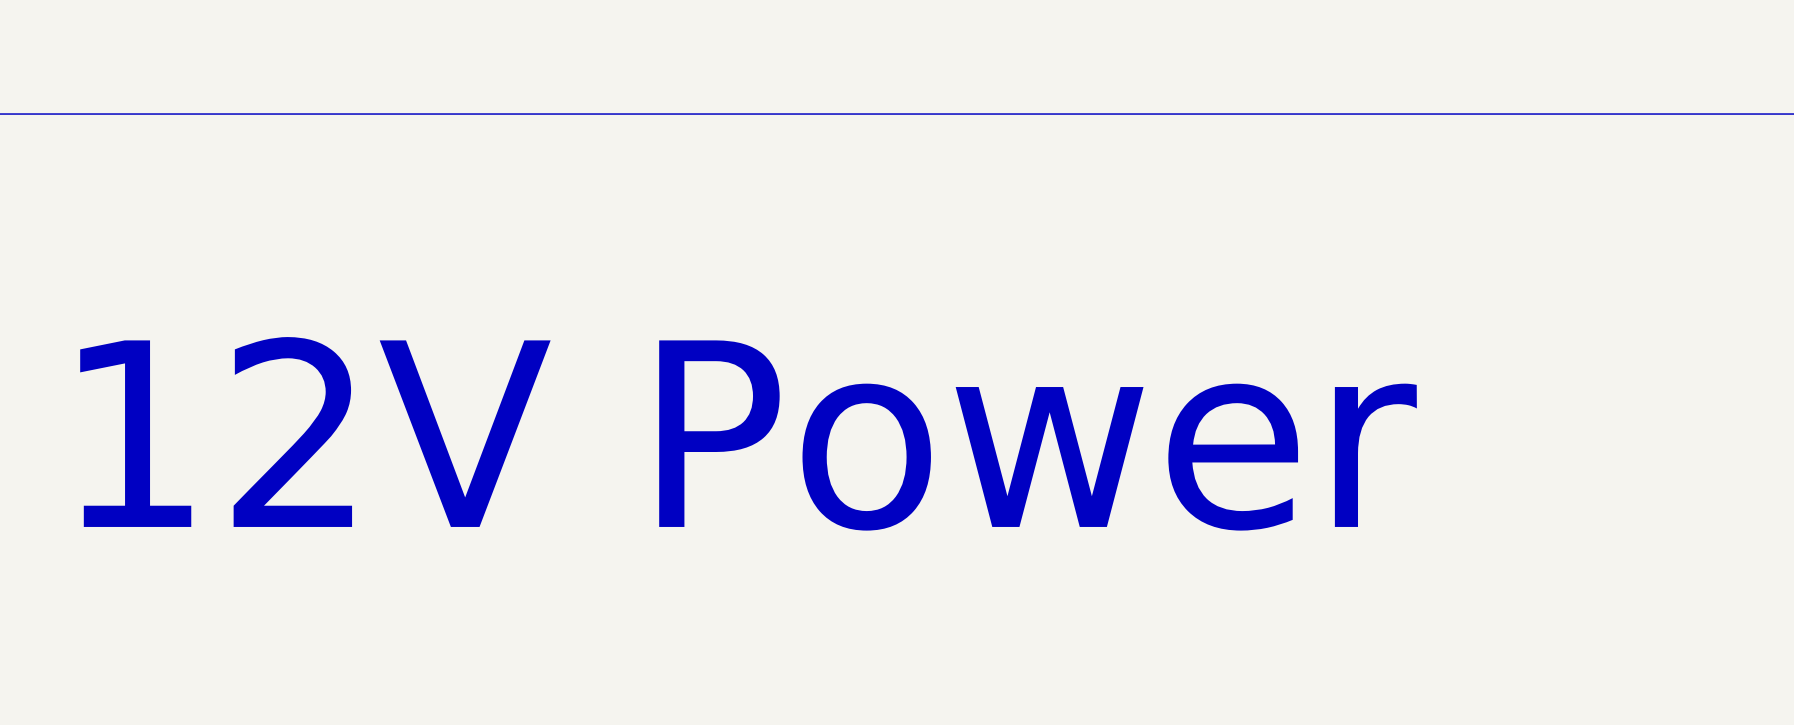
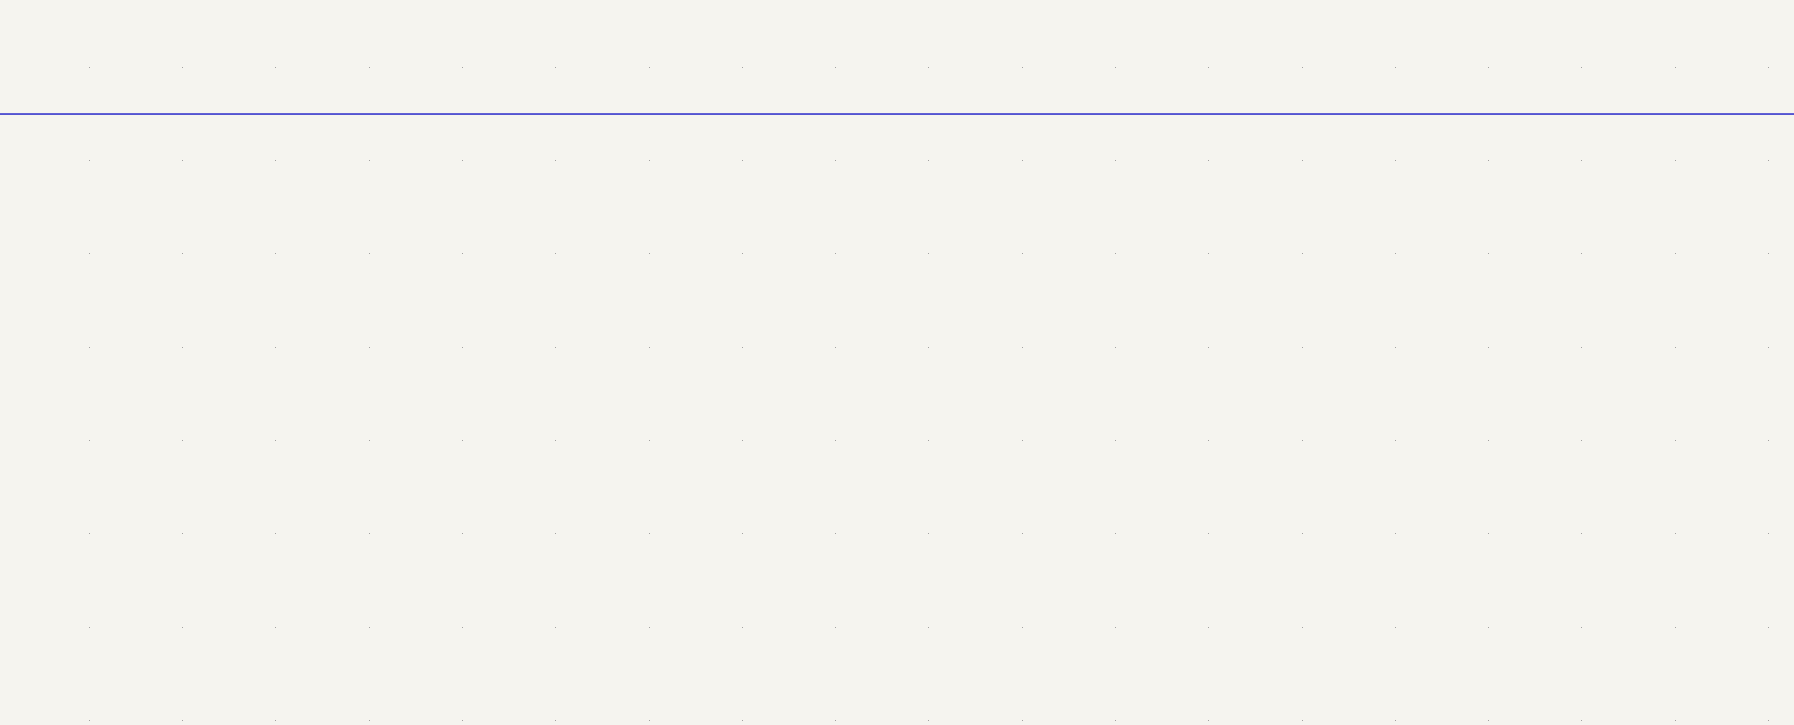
text: 12V Power (748, 433) -> none

